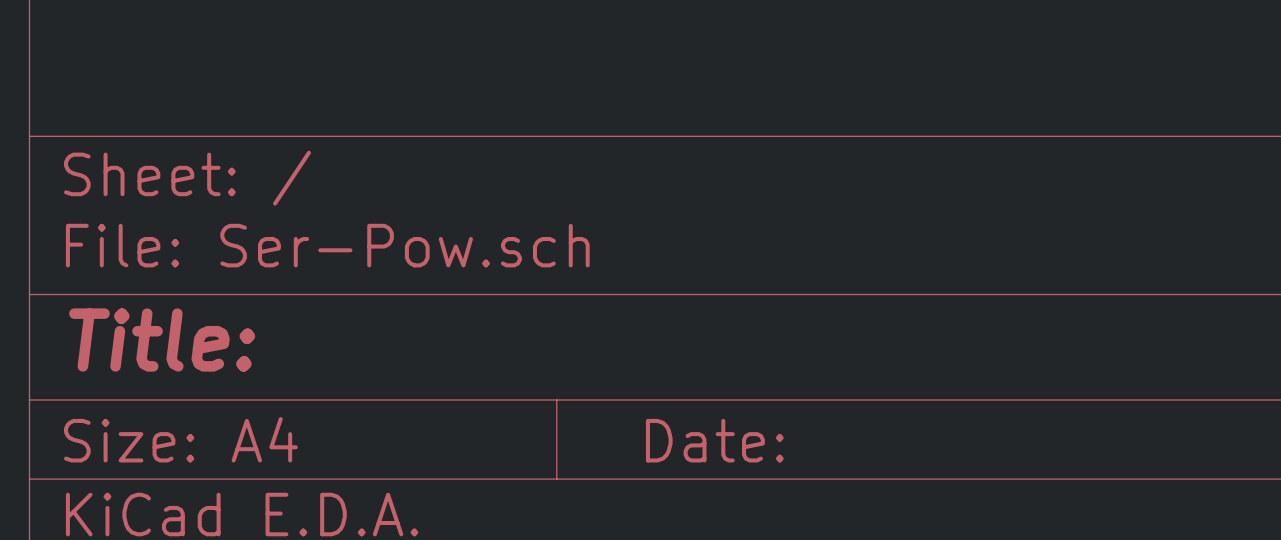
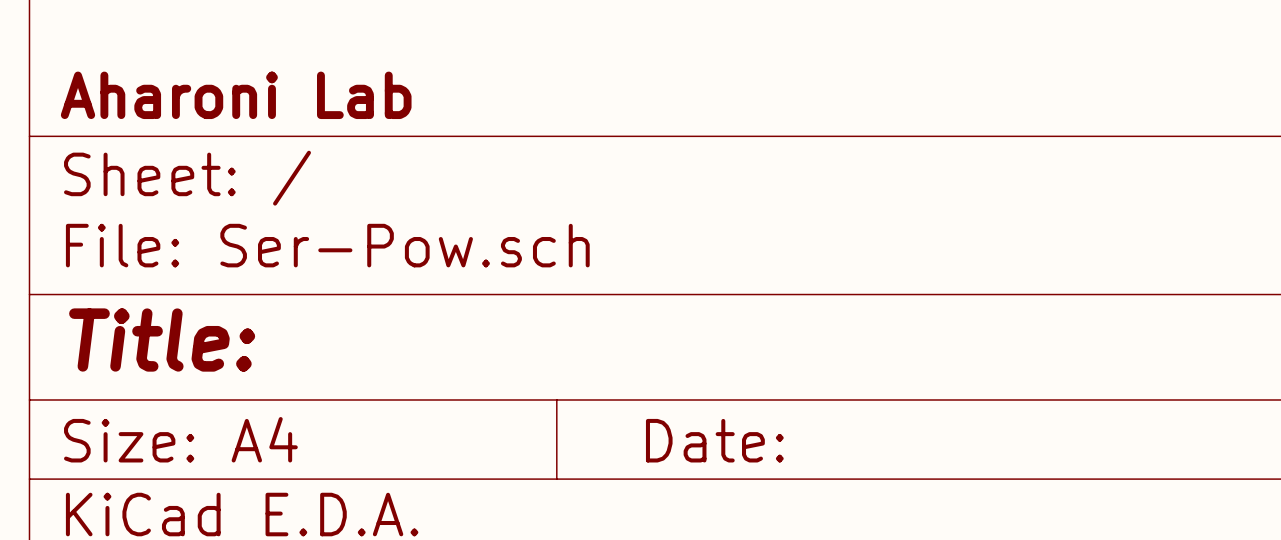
title block: none -> Aharoni Lab (236, 95)

